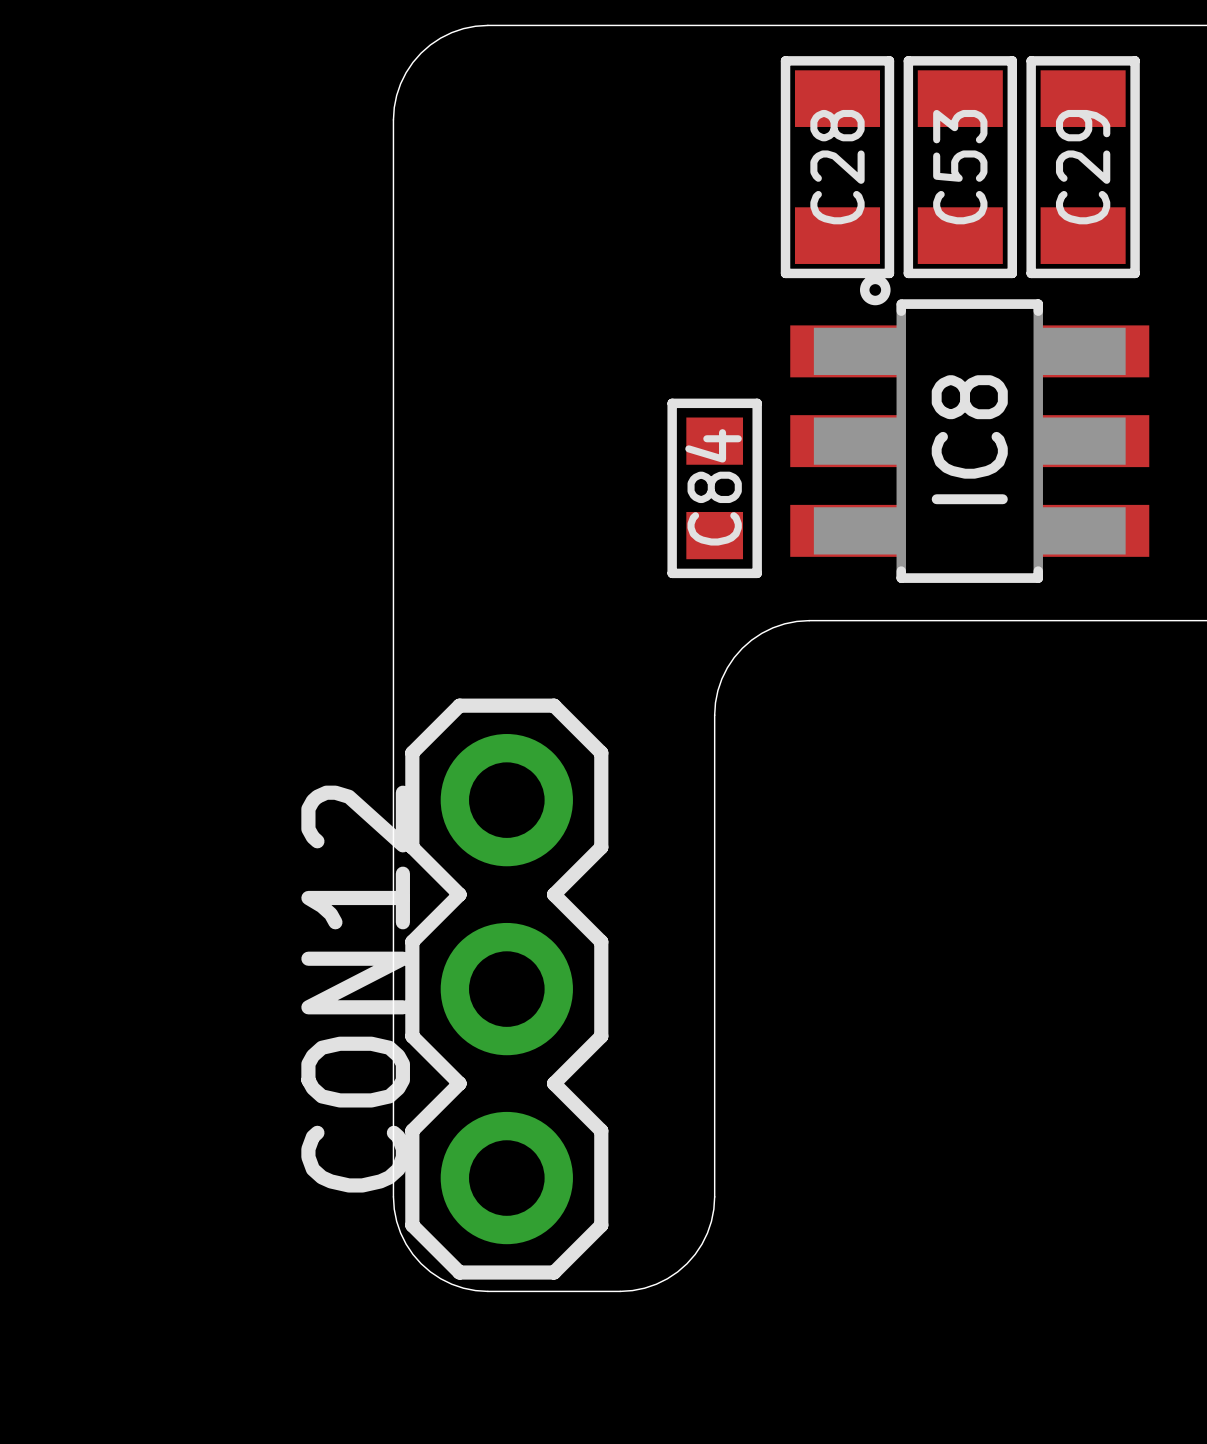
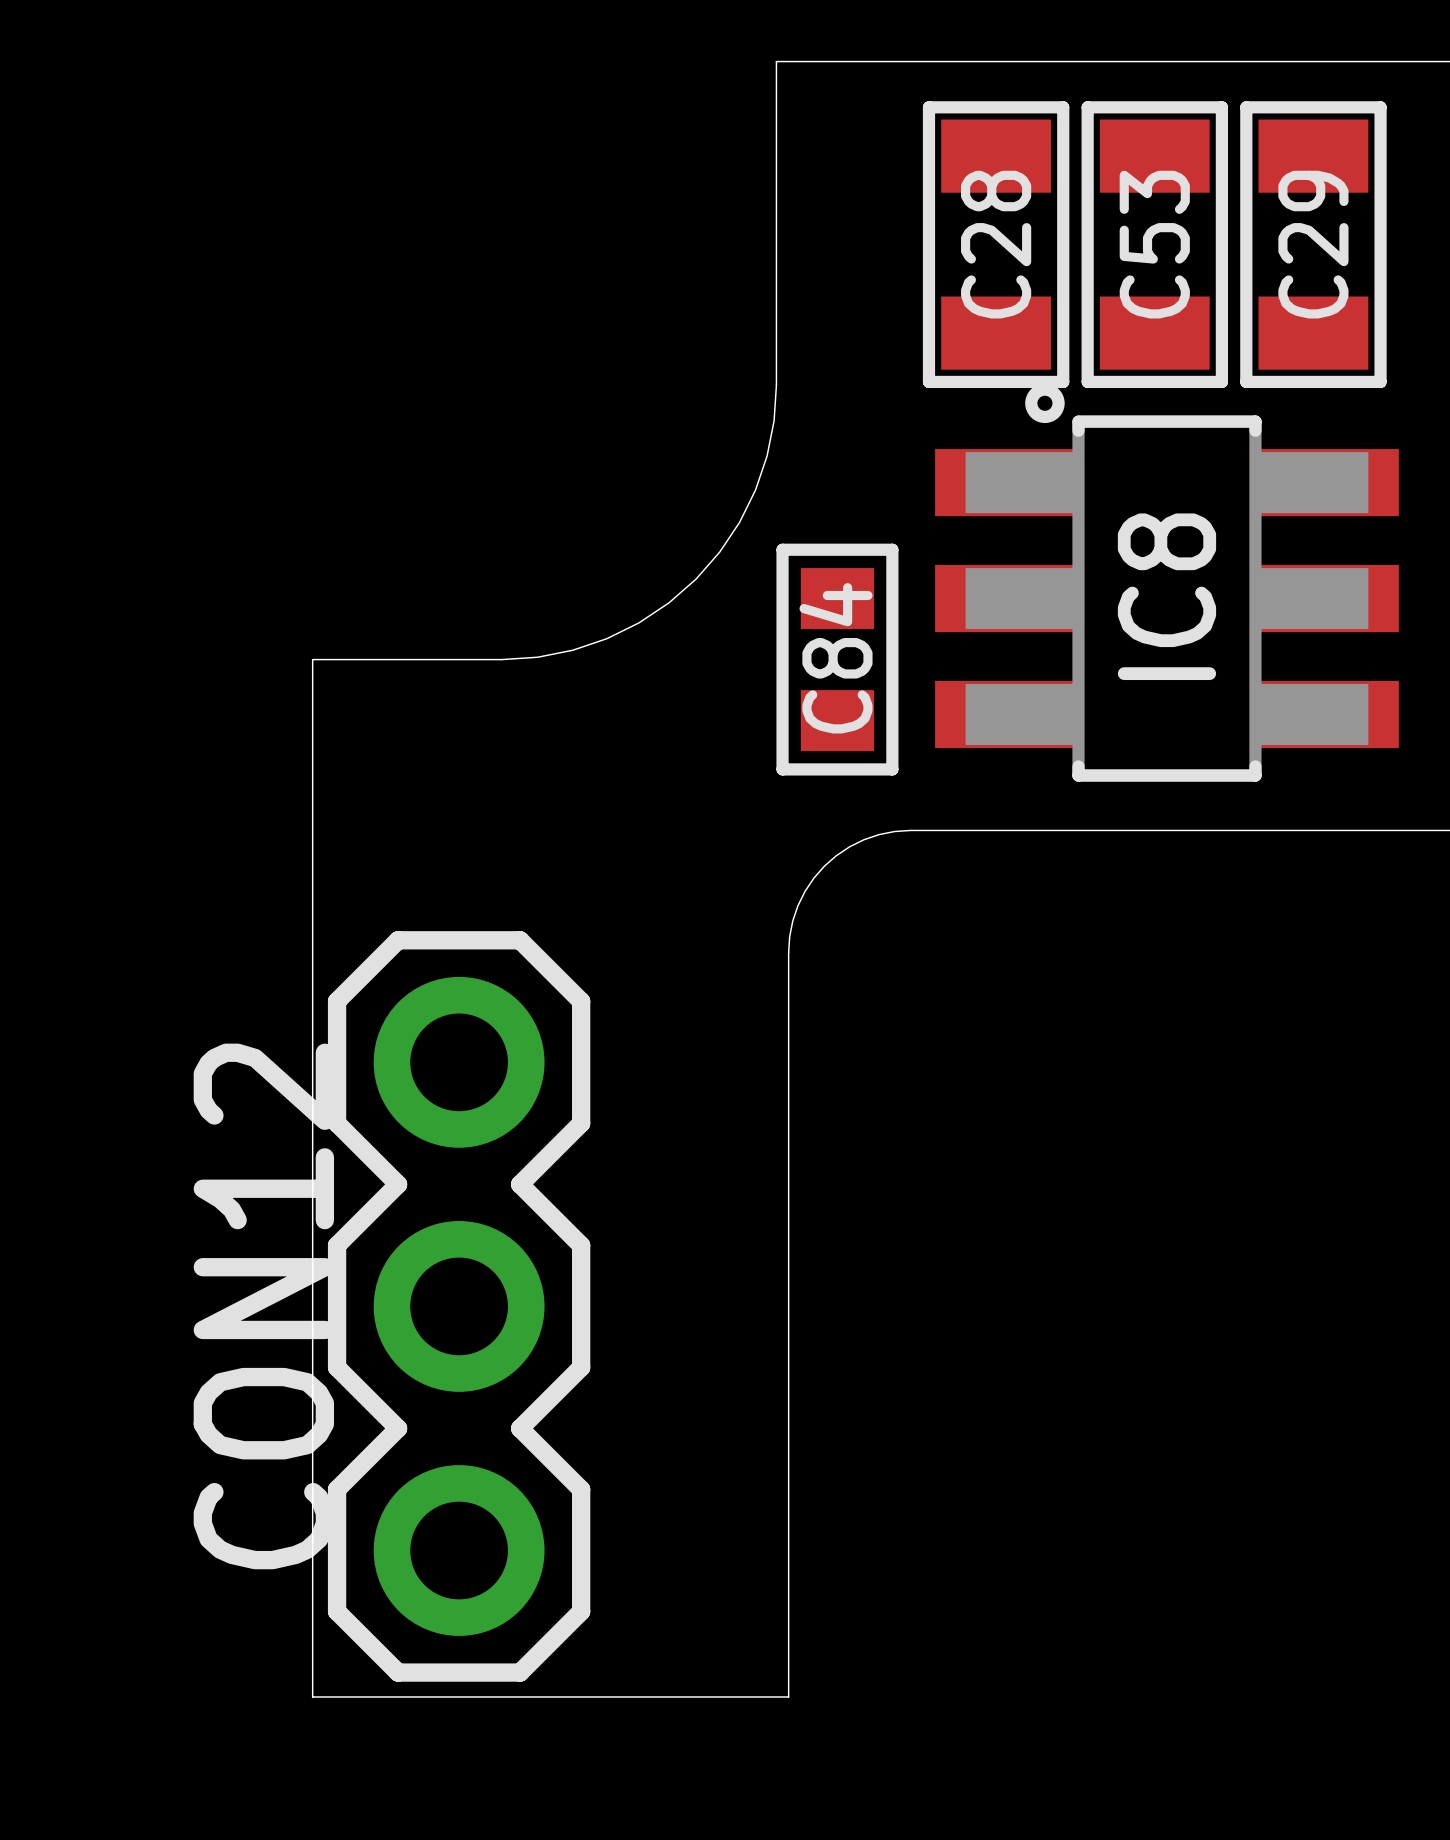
board edge: (667, 25) (487, 25) (463, 28) (451, 32) (430, 44) (412, 62) (400, 83) (394, 107) (394, 1209) (400, 1233) (406, 1244) (412, 1254) (430, 1271) (451, 1284) (463, 1288) (487, 1291) -> (776, 61) (776, 384) (774, 420) (767, 456) (755, 490) (739, 522) (719, 552) (696, 579) (668, 602) (639, 622) (606, 638) (572, 650) (537, 657) (501, 659) (312, 659) (312, 1696) (544, 1696)
board edge: (809, 620) (784, 623) (772, 627) (751, 640) (734, 657) (721, 678) (717, 690) (714, 715) (713, 1209) (707, 1233) (702, 1244) (695, 1254) (677, 1271) (656, 1284) (644, 1288) (620, 1291) -> (959, 830) (894, 831) (863, 839) (849, 846) (836, 855) (813, 878) (797, 905) (792, 920) (788, 952) (788, 1696) (715, 1696)
CON12 position: (506, 989) -> (459, 1306)

